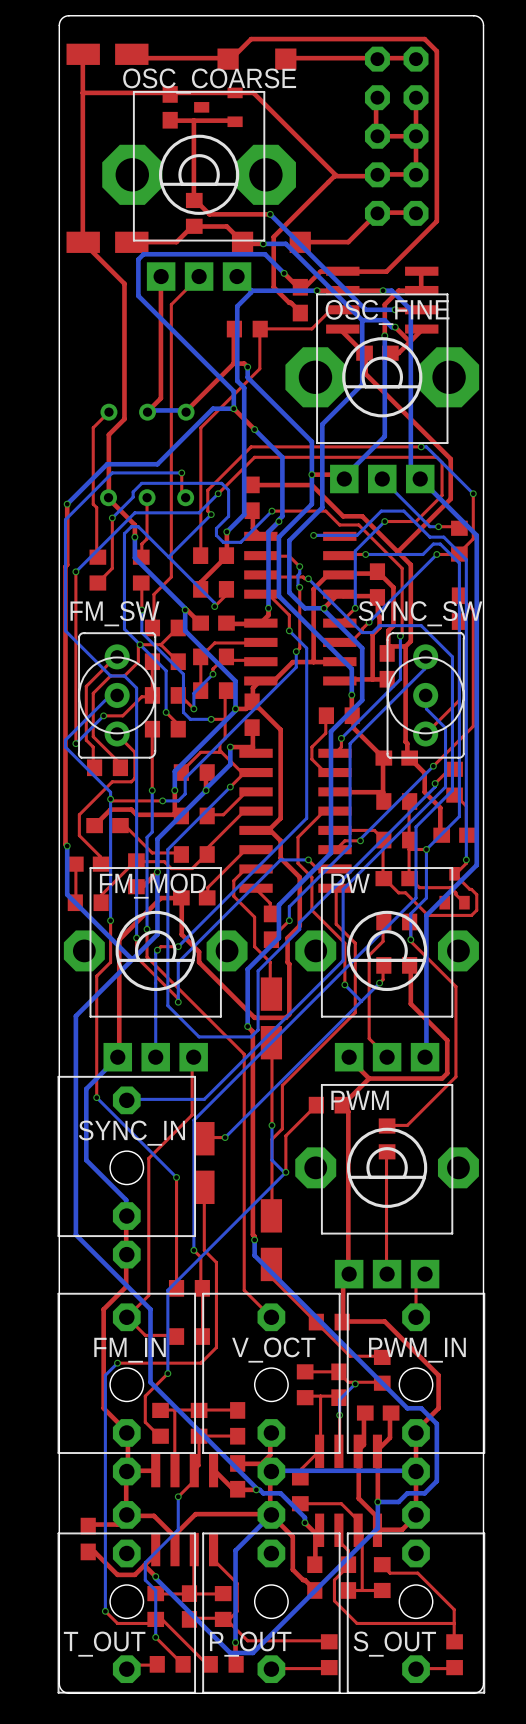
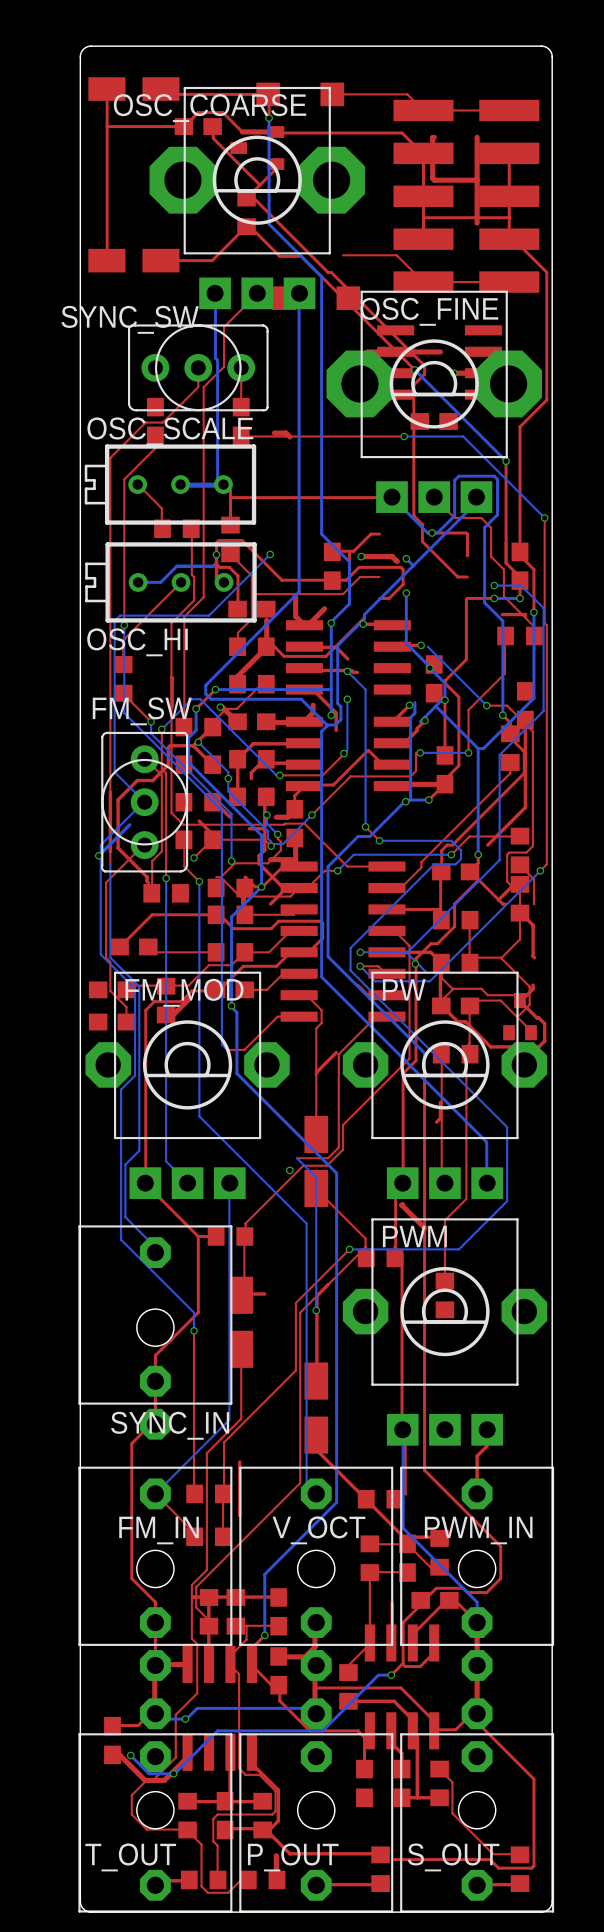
top track: (83, 54) (82, 242) (124, 283) (124, 419) (108, 434) (108, 497) (134, 524) (134, 537) -> (107, 89) (107, 260)
top track: (131, 54) (136, 58) (226, 58) (230, 59) (251, 39) (424, 39) (436, 51) (436, 221) (386, 271) (320, 271) (304, 287) (298, 287) (284, 273) -> (160, 89) (167, 94) (268, 94) (269, 118)
top track: (416, 59) (285, 59) -> (509, 110) (423, 110) (407, 94) (332, 94)
bottom track: none -> (269, 118) (269, 224) (321, 276) (321, 534) (349, 561) (349, 603) (331, 622) (331, 715)
via: none -> (269, 118)
OSC_COARSE name position: OSC_COARSE (209, 81) -> OSC_COARSE (210, 108)
top track: none -> (212, 126) (213, 138) (259, 185)
top track: (204, 92) (171, 92) (170, 94) (169, 92) (82, 92) -> (242, 131) (222, 112) (198, 112) (184, 126) (107, 126)
top track: (239, 92) (253, 92) (335, 175) (273, 236) (273, 287) (300, 313) -> (280, 131) (402, 133) (423, 153) (423, 239)
part rotation: 0° (170, 107) -> 90° clockwise (198, 126)
top track: none -> (509, 153) (509, 239) (513, 239) (546, 272) (546, 400) (520, 426) (520, 555) (533, 569) (533, 612)
top track: (170, 120) (235, 121) -> none
top track: (193, 120) (193, 200) (209, 214) (270, 214) -> none
top track: none -> (281, 164) (280, 164) (246, 198) (250, 195) (424, 365) (424, 374) (413, 385) (413, 515) (422, 524) (422, 541) (457, 576) (467, 576)
part: (396, 136) -> none
part: none -> (466, 196)
top track: none -> (509, 217) (423, 217)
top track: (416, 174) (334, 176) -> none
OSC_COARSE position: (199, 190) -> (257, 198)
top track: none -> (342, 255) (396, 255) (423, 282) (509, 282)
top track: none -> (160, 260) (212, 260) (245, 227) (250, 227) (279, 256) (301, 256) (414, 370)
part position: (194, 213) -> (246, 212)
top track: (416, 213) (377, 213) (348, 242) (300, 242) -> none
bottom track: (270, 214) (365, 309) (395, 309) -> none
via: (270, 214) -> none
bottom track: none -> (215, 293) (215, 358) (217, 360) (217, 483) (223, 484) (180, 484)
bottom track: none -> (299, 293) (299, 592) (205, 685) (205, 693) (211, 699) (301, 699) (326, 724)
part position: (107, 242) -> (133, 260)
top track: (242, 242) (226, 226) (194, 226) (176, 242) (131, 242) -> none
bottom track: (263, 243) (285, 243) (362, 320) -> none
via: (263, 243) -> none
top track: (421, 271) (421, 290) (398, 290) (384, 304) (384, 335) -> none
bottom track: (284, 273) (265, 254) (143, 254) (138, 259) (138, 295) (233, 391) (233, 408) (212, 408) (157, 464) (107, 464) (67, 504) -> none
via: (284, 273) -> none
top track: (161, 276) (160, 398) (147, 412) -> none
top track: (199, 276) (171, 304) (171, 577) (153, 594) (153, 627) (152, 627) -> (257, 293) (224, 327) (224, 366) (203, 387) (203, 597) (184, 616) (183, 727)
bottom track: (251, 290) (237, 306) (237, 380) (244, 387) (244, 514) (226, 531) -> none
bottom track: (317, 290) (251, 290) -> none
via: (317, 290) -> none
bottom track: (383, 290) (391, 290) (410, 309) (410, 469) (476, 535) (476, 865) (426, 915) (425, 1057) -> none
via: (383, 290) -> none
part: (300, 300) -> none
SYNC_SW: none -> (198, 367)
top track: none -> (241, 367) (241, 407)
bottom track: none -> (414, 370) (506, 461)
via: none -> (414, 370)
top track: (342, 309) (330, 309) (311, 328) (260, 329) (259, 368) (200, 427) (200, 555) -> (230, 553) (251, 575) (251, 618) (237, 632) (237, 646)
OSC_FINE name position: OSC_FINE (387, 312) -> OSC_FINE (429, 311)
bottom track: (362, 320) (384, 320) (391, 327) (395, 327) -> none
bottom track: (362, 320) (362, 384) (322, 424) (322, 507) (289, 540) (289, 592) (304, 608) (324, 608) (362, 648) (362, 700) (330, 731) (330, 852) (278, 905) (278, 938) (247, 969) (247, 1026) -> none
top track: (395, 327) (409, 341) -> none
via: (395, 327) -> none
top track: (234, 329) (233, 363) (186, 412) -> none
part: (247, 329) -> none
top track: (342, 329) (341, 330) (365, 354) (365, 374) (450, 459) (450, 498) (397, 551) -> none
top track: (421, 329) (398, 353) (390, 353) -> none
bottom track: (384, 335) (384, 436) (344, 479) -> none
via: (384, 335) -> none
part: none -> (155, 421)
part: none -> (241, 421)
top track: none -> (155, 435) (155, 448) (124, 479) (124, 625)
top track: none -> (241, 435) (404, 436)
bottom track: none -> (404, 436) (463, 436) (544, 518)
via: none -> (404, 436)
bottom track: (247, 367) (247, 377) (311, 441) (311, 504) (278, 537) (278, 596) (351, 669) (351, 695) -> none
via: (247, 367) -> none
via: none -> (506, 461)
OSC_FINE position: (382, 393) -> (434, 401)
top track: (233, 408) (254, 429) -> none
via: (233, 408) -> none
top track: none -> (137, 484) (161, 508) (162, 528)
top track: none -> (223, 484) (230, 491) (230, 525)
top track: (108, 412) (93, 427) (93, 504) (96, 507) (97, 557) -> none
OSC_SCALE side: top (147, 412) -> bottom (170, 484)
top track: none -> (392, 497) (230, 497)
bottom track: none -> (392, 497) (427, 533) (437, 533) (454, 515) (454, 480) (458, 476) (494, 476) (497, 479) (497, 514) (484, 527) (484, 602) (502, 620) (502, 715)
top track: none -> (434, 497) (454, 518) (481, 518) (491, 527) (491, 556) (503, 569) (503, 596) (533, 626) (534, 635)
bottom track: none -> (476, 497) (476, 502) (364, 614) (364, 618) (337, 645) (337, 703) (340, 706) (340, 719) (335, 724) (326, 724)
bottom track: (254, 429) (282, 457) (282, 516) (268, 531) (268, 608) -> none
via: (254, 429) -> none
top track: none -> (544, 518) (546, 864) (540, 870)
via: none -> (544, 518)
top track: (421, 446) (251, 446) (207, 490) (207, 511) (211, 514) -> none
bottom track: (421, 446) (426, 446) (473, 493) -> none
via: (421, 446) -> none
part: none -> (176, 528)
top track: none -> (432, 533) (466, 533) (467, 555)
via: none -> (432, 533)
top track: none -> (379, 534) (370, 534) (353, 551) (332, 551)
part: none -> (230, 539)
top track: (442, 462) (436, 457) (254, 457) (218, 493) -> (506, 543) (506, 461)
top track: none -> (349, 551) (349, 563)
top track: none -> (216, 554) (216, 542) (218, 540) (242, 540) (281, 580) (346, 580) (359, 567) (400, 567) (403, 569) (403, 584) (389, 598) (379, 598)
bottom track: (181, 472) (112, 472) (65, 519) (65, 630) (110, 675) (124, 675) (136, 688) (136, 938) -> none
bottom track: none -> (270, 554) (209, 615) (120, 615) (114, 620) (114, 772) (144, 801) (100, 845) (100, 954) (135, 988) (135, 1075) (121, 1089) (121, 1239) (194, 1312) (194, 1330)
via: none -> (270, 554)
bottom track: none -> (406, 558) (413, 565)
via: none -> (406, 558)
bottom track: (382, 479) (429, 526) (438, 526) -> none
top track: (442, 480) (442, 495) (416, 521) (384, 521) -> (506, 563) (520, 576) (520, 598)
bottom track: (146, 483) (141, 483) (133, 492) (133, 497) (112, 518) -> (176, 566) (160, 582) (138, 582)
top track: none -> (213, 566) (216, 564) (219, 567) (229, 567) (237, 575) (237, 609)
bottom track: (178, 483) (221, 483) (228, 490) (228, 516) (216, 528) (216, 535) (223, 542) (240, 542) (271, 511) -> none
part: none -> (332, 566)
part: none -> (520, 566)
top track: (252, 484) (311, 485) (343, 516) (362, 516) (410, 564) (410, 641) (405, 646) -> none
top track: none -> (379, 576) (360, 576) (343, 594) (251, 594)
bottom track: (218, 493) (199, 512) (134, 512) (75, 571) -> none
via: (218, 493) -> none
top track: (473, 493) (473, 538) (459, 554) (436, 554) -> none
via: (473, 493) -> none
top track: (147, 497) (147, 538) (141, 544) (141, 557) -> none
OSC_HI side: top (147, 497) -> bottom (170, 582)
top track: none -> (181, 582) (123, 640) (123, 664)
part: (252, 497) -> none
bottom track: none -> (494, 585) (521, 585) (543, 608) (543, 711) (499, 755) (499, 860) (406, 952)
via: none -> (494, 585)
top track: (67, 504) (67, 564) (65, 566) (65, 844) (67, 846) -> none
via: (67, 504) -> none
bottom track: none -> (406, 593) (406, 643) (444, 683) (444, 700) (441, 700) (420, 721)
via: none -> (406, 593)
top track: (271, 511) (325, 511) (339, 524) (358, 524) (402, 568) (402, 634) (400, 636) -> none
via: (271, 511) -> none
top track: none -> (494, 598) (466, 599) (466, 659) (444, 681) (458, 697) (458, 765) (446, 778) (446, 783) (428, 800)
via: none -> (494, 598)
bottom track: none -> (520, 598) (494, 598)
via: none -> (520, 598)
bottom track: (211, 514) (168, 557) -> none
via: (211, 514) -> none
top track: (112, 518) (112, 568) (97, 583) -> none
via: (112, 518) -> none
part: none -> (251, 609)
via: (278, 521) -> none
bottom track: (384, 521) (355, 551) (355, 608) -> none
via: (384, 521) -> none
bottom track: none -> (533, 612) (533, 698) (483, 748) (478, 748)
via: none -> (533, 612)
via: (438, 526) -> none
top track: none -> (364, 617) (325, 656) (284, 656) (274, 646) (266, 646)
via: (226, 531) -> none
via: none -> (331, 623)
bottom track: (313, 535) (357, 535) (381, 511) (403, 511) (429, 537) (443, 537) (466, 559) (466, 859) -> none
bottom track: none -> (124, 625) (124, 713) (221, 810) (221, 1044) (227, 1049)
via: none -> (124, 625)
bottom track: (134, 537) (134, 557) (185, 608) (185, 630) (235, 681) (235, 710) (174, 771) (174, 790) -> none
via: (134, 537) -> none
part rotation: 0° (459, 541) -> 90° clockwise (520, 635)
top track: none -> (505, 635) (505, 673) (468, 709) (468, 752)
bottom track: (365, 554) (422, 554) (433, 544) (440, 544) (459, 563) (459, 816) (426, 849) (426, 898) (410, 913) (410, 939) -> none
bottom track: (436, 554) (369, 622) -> none
via: (436, 554) -> none
bottom track: none -> (427, 646) (486, 705)
bottom track: (299, 566) (298, 575) (299, 587) -> none
via: (299, 566) -> none
part position: (97, 570) -> (123, 678)
part: (141, 570) -> none
top track: (75, 571) (75, 743) -> none
via: (75, 571) -> none
via: none -> (429, 668)
bottom track: none -> (347, 671) (365, 689) (365, 826)
via: none -> (347, 671)
bottom track: (308, 578) (362, 632) (372, 632) (379, 625) (421, 625) (452, 656) (452, 790) (416, 826) (416, 898) (193, 1120) (193, 1250) -> none
via: (308, 578) -> none
top track: (299, 587) (299, 648) (296, 651) -> none
via: (299, 587) -> none
top track: (226, 589) (225, 596) (214, 606) -> (266, 684) (261, 684) (236, 708) (226, 708) (213, 721) (213, 727)
top track: none -> (215, 689) (196, 708)
via: none -> (215, 689)
bottom track: none -> (331, 689) (215, 689)
top track: (459, 595) (473, 610) (473, 726) (433, 766) -> none
top track: none -> (123, 693) (151, 721)
bottom track: none -> (347, 699) (347, 750)
via: none -> (347, 699)
top track: none -> (444, 700) (445, 755)
via: none -> (444, 700)
bottom track: none -> (414, 702) (414, 713) (410, 717) (410, 800)
bottom track: (214, 606) (214, 603) (138, 526) (131, 526) (124, 533) (124, 629) (166, 670) (166, 712) -> none
via: (214, 606) -> none
via: (268, 608) -> none
top track: (324, 608) (337, 594) (377, 597) (379, 627) (372, 634) (372, 679) -> none
via: (324, 608) -> none
top track: none -> (486, 705) (507, 705) (532, 731) (532, 846) (526, 852) (509, 852) (507, 854) (507, 881) (520, 894) (520, 939) (501, 958)
via: none -> (486, 705)
bottom track: none -> (435, 706) (478, 748)
bottom track: (141, 610) (141, 632) (183, 674) (183, 712) (190, 719) (211, 719) -> none
via: (141, 610) -> none
bottom track: none -> (196, 708) (196, 730) (188, 737) (188, 762) (261, 835) (261, 886) (231, 916) (231, 1007) (236, 1012) (236, 1073) (336, 1173) (336, 1502) (264, 1574) (264, 1635)
via: none -> (196, 708)
via: none -> (331, 715)
via: none -> (502, 715)
bottom track: none -> (151, 721) (151, 733) (231, 813) (231, 861)
via: none -> (151, 721)
bottom track: none -> (326, 724) (321, 731) (321, 976) (486, 1142) (487, 1183)
top track: none -> (161, 729) (161, 768) (166, 773) (166, 878)
bottom track: none -> (161, 729) (191, 699) (200, 699) (276, 775) (279, 775)
via: none -> (161, 729)
bottom track: (289, 630) (306, 648) (306, 818) (178, 946) -> none
via: (289, 630) -> none
bottom track: (400, 636) (400, 679) (341, 738) -> none
via position: (400, 636) -> (468, 752)
bottom track: none -> (198, 742) (228, 772) (228, 791) (268, 831) (268, 838) (271, 841) (271, 846)
via: none -> (198, 742)
via: (140, 644) -> none
top track: (405, 646) (389, 646) (387, 653) (388, 630) (393, 625) (393, 587) (377, 571) (376, 573) (327, 575) (313, 589) (313, 662) -> none
top track: (405, 646) (407, 757) (424, 773) (424, 792) (440, 807) (441, 835) -> none
part: none -> (510, 748)
bottom track: none -> (478, 748) (478, 854)
top track: none -> (347, 750) (322, 775) (279, 775)
bottom track: (296, 651) (296, 667) (185, 778) (185, 793) (178, 800) (162, 800) -> none
top track: none -> (415, 752) (415, 771) (410, 776) (350, 776) (311, 815)
via: none -> (420, 752)
bottom track: none -> (468, 752) (420, 752)
top track: none -> (144, 758) (161, 775) (161, 851) (152, 861) (151, 893)
top track: (117, 656) (86, 686) -> (198, 367) (198, 387) (162, 422) (145, 422) (110, 457) (110, 792)
bottom track: (425, 656) (424, 669) (350, 743) (350, 846) (289, 906) (289, 920) -> none
top track: (152, 661) (152, 696) (141, 696) (122, 715) (103, 715) -> none
top track: (339, 661) (292, 662) (275, 679) (261, 679) (252, 688) (252, 701) (280, 729) (280, 818) (268, 830) -> (392, 764) (382, 764) (367, 750) (333, 785) (305, 785) (294, 795) (294, 809)
via: none -> (279, 775)
via: none -> (228, 778)
bottom track: (212, 674) (193, 693) (193, 708) -> none
via: (212, 674) -> none
bottom track: none -> (428, 800) (406, 800) (369, 836) (358, 836) (328, 866) (328, 956) (424, 1053) (424, 1065)
via: none -> (428, 800)
bottom track: (117, 695) (108, 696) (65, 740) (65, 747) (110, 792) (110, 920) -> none
top track: (351, 695) (353, 728) (383, 758) (383, 801) -> none
bottom track: (425, 695) (426, 708) (445, 728) (445, 787) (343, 889) (343, 960) (204, 1099) (126, 1100) -> none
SYNC_SW: (425, 695) -> none
bottom track: none -> (266, 815) (266, 823) (277, 834)
via: none -> (266, 815)
bottom track: none -> (311, 815) (283, 844) (271, 844)
via: none -> (311, 815)
via: (193, 708) -> none
via: (235, 708) -> none
via: (166, 712) -> none
via: (103, 715) -> none
top track: (326, 715) (325, 733) (311, 747) (311, 759) (324, 771) (334, 772) -> (510, 762) (510, 773) (421, 862) (421, 867) (400, 887) (386, 887)
part: (339, 715) -> none
top track: none -> (365, 826) (379, 840)
via: none -> (365, 826)
via: (211, 719) -> none
top track: none -> (277, 834) (277, 838) (280, 841) (280, 850) (268, 863) (234, 863) (220, 877)
via: none -> (277, 834)
top track: none -> (520, 836) (469, 836) (451, 854)
top track: (152, 729) (152, 790) -> (183, 839) (184, 866) (199, 881)
bottom track: none -> (379, 840) (451, 840) (461, 850) (461, 859) (455, 864) (434, 864) (350, 948) (350, 970) (507, 1127) (507, 1201) (458, 1249) (349, 1249)
top track: none -> (144, 844) (106, 882) (106, 957) (110, 961) (110, 990) (126, 1007) (126, 1022)
top track: (117, 734) (134, 752) (134, 778) (131, 781) (112, 781) (79, 814) (79, 835) (100, 856) (101, 864) -> none
top track: none -> (271, 846) (264, 839) (212, 839) (194, 857)
via: none -> (271, 846)
top track: (341, 738) (341, 747) (334, 753) -> (191, 528) (194, 600) (171, 623) (171, 812) (183, 824) (304, 823) (347, 866) (386, 866)
via position: (341, 738) -> (379, 840)
part: none -> (520, 850)
top track: (86, 740) (93, 747) (94, 767) -> (110, 851) (110, 864)
bottom track: none -> (451, 854) (353, 854) (337, 870)
via: none -> (451, 854)
top track: none -> (478, 854) (478, 863) (470, 871) (502, 904) (505, 904)
via: none -> (478, 854)
via: none -> (194, 857)
bottom track: (230, 747) (230, 764) (157, 839) (157, 934) (75, 1016) (75, 1234) (150, 1309) (150, 1382) (256, 1489) (259, 1489) (263, 1493) (280, 1493) (304, 1517) (304, 1522) -> none
via: (230, 747) -> none
via: none -> (231, 861)
bottom track: none -> (110, 864) (110, 957) (139, 986) (139, 1150) (125, 1164) (125, 1217) (155, 1247)
top track: (220, 751) (200, 752) (181, 772) -> none
top track: none -> (520, 864) (533, 879) (534, 904)
top track: none -> (299, 866) (293, 862) (287, 862) (262, 886) (255, 886) (244, 877)
top track: none -> (337, 870) (324, 870) (307, 887) (299, 887) (290, 896) (240, 896) (220, 877)
via: none -> (337, 870)
bottom track: none -> (540, 870) (429, 981) (375, 981) (360, 966)
via: none -> (540, 870)
top track: none -> (220, 877) (216, 877)
bottom track: none -> (166, 878) (166, 1161) (187, 1182)
via: none -> (166, 878)
top track: none -> (478, 879) (454, 904) (454, 926) (437, 943) (431, 943) (415, 958) (415, 1060) (403, 1073) (403, 1181) (395, 1190) (394, 1247) (402, 1254) (402, 1428) (405, 1432) (405, 1493)
bottom track: none -> (199, 881) (199, 1116) (306, 1223) (306, 1484) (316, 1493)
via: none -> (199, 881)
bottom track: (433, 766) (360, 840) -> none
via: (433, 766) -> none
part position: (107, 767) -> (166, 893)
via: none -> (261, 886)
bottom track: (435, 783) (435, 787) (299, 922) (299, 929) (258, 970) (258, 1029) (251, 1036) (199, 1036) (167, 1005) (167, 849) (230, 787) -> none
via: (435, 783) -> none
via: (230, 787) -> none
bottom track: (152, 790) (152, 832) (147, 837) (147, 929) -> none
via: (152, 790) -> none
top track: (174, 790) (174, 813) (181, 815) (136, 814) (131, 809) (110, 809) (94, 825) -> (198, 1236) (145, 1183) (145, 1010) (154, 1001) (181, 1001) (191, 990) (219, 989) (243, 966) (276, 966) (290, 952) (309, 951) (322, 938) (322, 923) (320, 921) (278, 921) (271, 928) (233, 928) (219, 914) (152, 914) (119, 946)
via: (174, 790) -> none
via: (206, 790) -> none
top track: (256, 791) (245, 792) (223, 814) (207, 815) -> (299, 909) (293, 914) (244, 914)
top track: (334, 791) (383, 792) -> (386, 909) (439, 909) (441, 914) (441, 850) (447, 845) (452, 845) (524, 773) (524, 751) (511, 738) (510, 722) (502, 715)
part: none -> (230, 914)
top track: none -> (470, 914) (469, 957) (500, 957) (529, 986) (529, 1004) (517, 1017)
top track: (110, 799) (112, 800) (162, 800) -> none
via: (110, 799) -> none
via: (162, 800) -> none
top track: (409, 801) (409, 878) (419, 887) (450, 887) (464, 902) -> none
top track: (256, 811) (244, 811) (207, 847) (207, 854) (192, 868) (171, 868) (164, 861) (134, 861) (101, 894) (101, 902) -> (299, 930) (290, 930) (269, 952) (244, 952) (231, 965) (209, 965) (188, 985) (126, 984)
top track: (334, 811) (324, 811) (298, 837) (298, 863) (311, 877) (311, 910) (344, 943) (344, 984) -> (386, 930) (394, 930) (409, 945) (409, 1058) (343, 1124) (343, 1149) (326, 1165) (303, 1165) (245, 1223) (244, 1291) (241, 1295)
part: (194, 815) -> none
top track: (120, 825) (126, 826) (152, 852) (181, 854) -> (148, 946) (154, 952) (216, 952)
part: none -> (230, 952)
top track: (256, 830) (270, 830) (280, 840) (280, 858) (299, 877) (299, 925) (287, 938) (289, 1014) (285, 1017) (254, 1017) (199, 962) (199, 951) (181, 934) (181, 897) (160, 898) (119, 939) (117, 1057) -> none
bottom track: none -> (360, 952) (406, 952) (425, 971)
via: none -> (360, 952)
top track: none -> (441, 957) (441, 978) (452, 989)
part: (454, 835) -> none
top track: (360, 840) (344, 840) (334, 849) -> (360, 966) (378, 966) (386, 973)
via: none -> (360, 966)
bottom track: (67, 846) (67, 894) (132, 959) -> none
via: (67, 846) -> none
part footprint: [173, 846, 215, 863] -> [206, 981, 255, 999]
top track: (256, 849) (244, 851) (207, 887) (207, 897) -> (299, 973) (283, 973) (266, 989) (244, 989)
top track: (426, 849) (409, 849) -> none
via: (426, 849) -> none
bottom track: (308, 859) (280, 859) (178, 962) (178, 1002) -> none
via: (308, 859) -> none
via: (466, 859) -> none
top track: (75, 864) (75, 902) -> none
top track: (256, 868) (244, 870) (233, 880) (233, 896) (254, 917) (254, 946) (270, 962) (271, 994) -> (299, 995) (306, 995) (321, 1010) (321, 1023) (316, 1028) (316, 1134)
top track: none -> (520, 995) (487, 995) (481, 988) (453, 988) (441, 1000)
via: (157, 872) -> none
via: none -> (231, 1005)
top track: (256, 888) (270, 903) (271, 913) -> (299, 1016) (277, 1016) (244, 1049) (227, 1049)
top track: (334, 888) (336, 924) (355, 943) (355, 1012) (282, 1085) (282, 1128) -> (386, 1016) (376, 1016) (338, 1054) (338, 1147) (328, 1158) (296, 1158)
part footprint: [67, 894, 109, 912] -> [88, 1013, 137, 1031]
part: (194, 897) -> none
top track: none -> (530, 1027) (526, 1026) (500, 1000) (469, 1000) (469, 1043)
top track: none -> (441, 1043) (441, 1179) (444, 1182)
top track: none -> (469, 1043) (466, 1046) (466, 1198) (444, 1220) (444, 1286)
top track: (110, 920) (110, 962) (96, 976) (96, 1097) -> none
via: (110, 920) -> none
via: (289, 920) -> none
top track: (383, 921) (383, 941) (369, 955) (369, 1038) (387, 1057) -> none
top track: (409, 921) (410, 941) (455, 986) (455, 1076) (407, 1125) (387, 1126) -> none
part: (271, 926) -> none
top track: (147, 929) (147, 957) (244, 1054) (244, 1290) (271, 1317) -> none
via: (147, 929) -> none
top track: none -> (424, 1065) (424, 1470) (500, 1546) (500, 1578) (486, 1592) (467, 1592) (463, 1588) (436, 1588) (423, 1601) (418, 1602) (418, 1607) (403, 1622) (403, 1664)
top track: (136, 938) (136, 957) (178, 998) (178, 1002) -> none
via: (136, 938) -> none
via: (410, 939) -> none
top track: (178, 946) (160, 946) (157, 950) -> none
via: (178, 946) -> none
bottom track: (157, 950) (155, 950) (155, 1057) -> none
via: (157, 950) -> none
part: (396, 965) -> none
top track: (409, 965) (410, 1003) (447, 1040) (447, 1073) (442, 1078) (369, 1078) (342, 1105) (348, 1111) (349, 1274) (343, 1279) (342, 1322) (384, 1321) (438, 1375) (438, 1408) (416, 1432) -> (412, 1643) (412, 1634) (444, 1602) (456, 1602) (477, 1622)
FM_MOD position: (155, 969) -> (187, 1085)
PW position: (387, 969) -> (444, 1085)
bottom track: (379, 983) (225, 1137) -> none
via: (379, 983) -> none
bottom track: (344, 984) (361, 1001) -> none
via: (344, 984) -> none
via: (178, 1002) -> none
bottom track: none -> (296, 1158) (316, 1177) (316, 1310)
top track: (247, 1026) (252, 1031) (252, 1234) (254, 1239) -> none
bottom track: none -> (229, 1183) (229, 1419) (155, 1493)
top track: (271, 1042) (271, 1125) -> (316, 1188) (365, 1238) (365, 1247)
bottom track: (117, 1057) (86, 1088) (86, 1160) (126, 1200) (126, 1216) -> none
top track: (193, 1057) (192, 1115) (148, 1158) (148, 1295) (126, 1317) (145, 1335) (176, 1336) -> none
top track: none -> (216, 1236) (198, 1236)
part: none -> (230, 1236)
top track: none -> (365, 1247) (328, 1284)
bottom track: (96, 1097) (176, 1177) -> none
via: (96, 1097) -> none
top track: none -> (349, 1249) (295, 1302) (295, 1370) (224, 1442) (223, 1536)
via: none -> (349, 1249)
top track: (316, 1105) (285, 1135) (285, 1172) -> none
bottom track: (271, 1125) (271, 1160) (285, 1172) (167, 1290) (167, 1373) -> none
via: (271, 1125) -> none
SYNC_IN name position: SYNC_IN (131, 1133) -> SYNC_IN (170, 1425)
via: (225, 1137) -> none
top track: none -> (316, 1295) (300, 1312) (300, 1483) (196, 1587) (196, 1607) (209, 1620) (209, 1626)
top track: (387, 1151) (387, 1274) -> none
via: none -> (316, 1310)
top track: none -> (194, 1330) (194, 1493)
via: (285, 1172) -> none
top track: (176, 1177) (176, 1288) -> none
via position: (176, 1177) -> (194, 1330)
PWM position: (387, 1186) -> (444, 1331)
top track: (203, 1187) (204, 1250) (216, 1262) (216, 1347) (200, 1363) (117, 1363) -> (241, 1349) (241, 1418) (206, 1453) (206, 1570) (191, 1585) (191, 1638) (197, 1644) (197, 1693) (175, 1714) (175, 1757) (152, 1781) (145, 1781) (131, 1795) (131, 1814) (146, 1829) (187, 1829) (201, 1844) (201, 1886) (207, 1892) (228, 1892) (241, 1879) (248, 1879)
top track: (126, 1216) (126, 1286) (103, 1309) (103, 1408) (127, 1434) (126, 1471) -> none
bottom track: (254, 1239) (254, 1255) (407, 1408) (421, 1408) (436, 1423) (436, 1481) (424, 1493) (407, 1493) (398, 1501) (377, 1501) (377, 1528) (252, 1652) (230, 1652) (155, 1576) -> none
via: (254, 1239) -> none
top track: (193, 1250) (200, 1257) (202, 1288) -> none
via: (193, 1250) -> none
bottom track: none -> (402, 1429) (403, 1528) (477, 1602) (477, 1622)
part: (189, 1288) -> none
top track: none -> (155, 1493) (194, 1532) (194, 1536)
part: none -> (209, 1493)
part: (189, 1336) -> none
part: none -> (209, 1536)
top track: none -> (369, 1543) (407, 1544)
top track: none -> (407, 1544) (435, 1572) (444, 1572)
bottom track: (117, 1363) (105, 1375) (105, 1611) -> none
via: (117, 1363) -> none
top track: (305, 1371) (338, 1371) (348, 1382) (382, 1383) -> none
top track: (167, 1373) (145, 1396) (145, 1422) (160, 1436) -> none
via: (167, 1373) -> none
bottom track: (355, 1383) (339, 1399) (339, 1415) -> none
via: (355, 1383) -> none
part position: (305, 1384) -> (369, 1558)
part position: (338, 1384) -> (407, 1558)
top track: (320, 1396) (320, 1449) (301, 1469) (300, 1477) -> (407, 1572) (369, 1572) (369, 1644) (348, 1665) (348, 1672)
top track: (338, 1397) (337, 1396) (305, 1397) -> none
top track: (365, 1413) (363, 1444) (358, 1451) (358, 1498) (377, 1517) (377, 1530) (402, 1529) (416, 1515) (416, 1510) -> none
top track: (391, 1413) (389, 1437) (377, 1451) (377, 1501) -> none
via: (339, 1415) -> none
part position: (160, 1423) -> (209, 1611)
top track: (237, 1436) (199, 1436) (199, 1465) (193, 1470) (193, 1481) (178, 1496) -> none
via: none -> (264, 1635)
top track: none -> (434, 1643) (434, 1652) (420, 1666) (405, 1666) (403, 1664)
top track: (213, 1470) (232, 1488) (256, 1489) -> none
top track: none -> (403, 1664) (391, 1675)
bottom track: (416, 1471) (271, 1471) -> none
bottom track: none -> (391, 1675) (378, 1675) (322, 1730) (217, 1730) (174, 1773) (148, 1773) (130, 1755)
via: none -> (391, 1675)
via: (256, 1489) -> none
top track: none -> (316, 1687) (400, 1687) (434, 1721) (434, 1730)
bottom track: (178, 1496) (178, 1529) (145, 1562) (145, 1580) (155, 1590) (155, 1637) -> none
via: (178, 1496) -> none
via: (377, 1501) -> none
bottom track: none -> (316, 1708) (197, 1708) (186, 1719) (166, 1719) (155, 1708)
bottom track: (271, 1514) (235, 1550) (235, 1642) -> none
via: none -> (185, 1719)
top track: (304, 1522) (315, 1533) (319, 1530) (315, 1534) (314, 1564) -> (264, 1635) (251, 1648) (251, 1665) (271, 1684) (279, 1685) (279, 1700) (309, 1730) (358, 1730) (364, 1736) (364, 1769)
via: (304, 1522) -> none
top track: (88, 1526) (117, 1524) (126, 1514) (153, 1515) (174, 1536) (175, 1549) (174, 1534) (195, 1514) (271, 1514) (292, 1536) (292, 1569) (314, 1590) -> (112, 1726) (138, 1725) (155, 1708) (155, 1602) (131, 1578) (131, 1443) (155, 1419) (155, 1355) (198, 1312) (198, 1236)
top track: none -> (434, 1729) (455, 1729) (477, 1708) (470, 1715) (533, 1779) (533, 1866) (531, 1868) (498, 1868) (489, 1859) (394, 1859)
via: none -> (130, 1755)
top track: (348, 1564) (334, 1580) (334, 1600) (357, 1623) (454, 1623) -> none
top track: (382, 1564) (389, 1573) (417, 1573) (454, 1609) (454, 1641) -> (439, 1769) (452, 1782) (452, 1813) (493, 1854) (520, 1854)
top track: (144, 1565) (155, 1576) -> none
via position: (155, 1576) -> (173, 1773)
top track: (105, 1611) (117, 1623) (152, 1623) (155, 1620) (162, 1620) (206, 1663) (210, 1664) -> none
via: (105, 1611) -> none
top track: (155, 1637) (183, 1664) -> (284, 1626) (246, 1625) (246, 1639) (230, 1655) (230, 1665) (239, 1674) (239, 1768) (245, 1774) (259, 1774) (275, 1790) (275, 1811) (272, 1814) (217, 1814) (213, 1818) (213, 1841) (217, 1845) (218, 1879)
via: (155, 1637) -> none
via: (235, 1642) -> none

